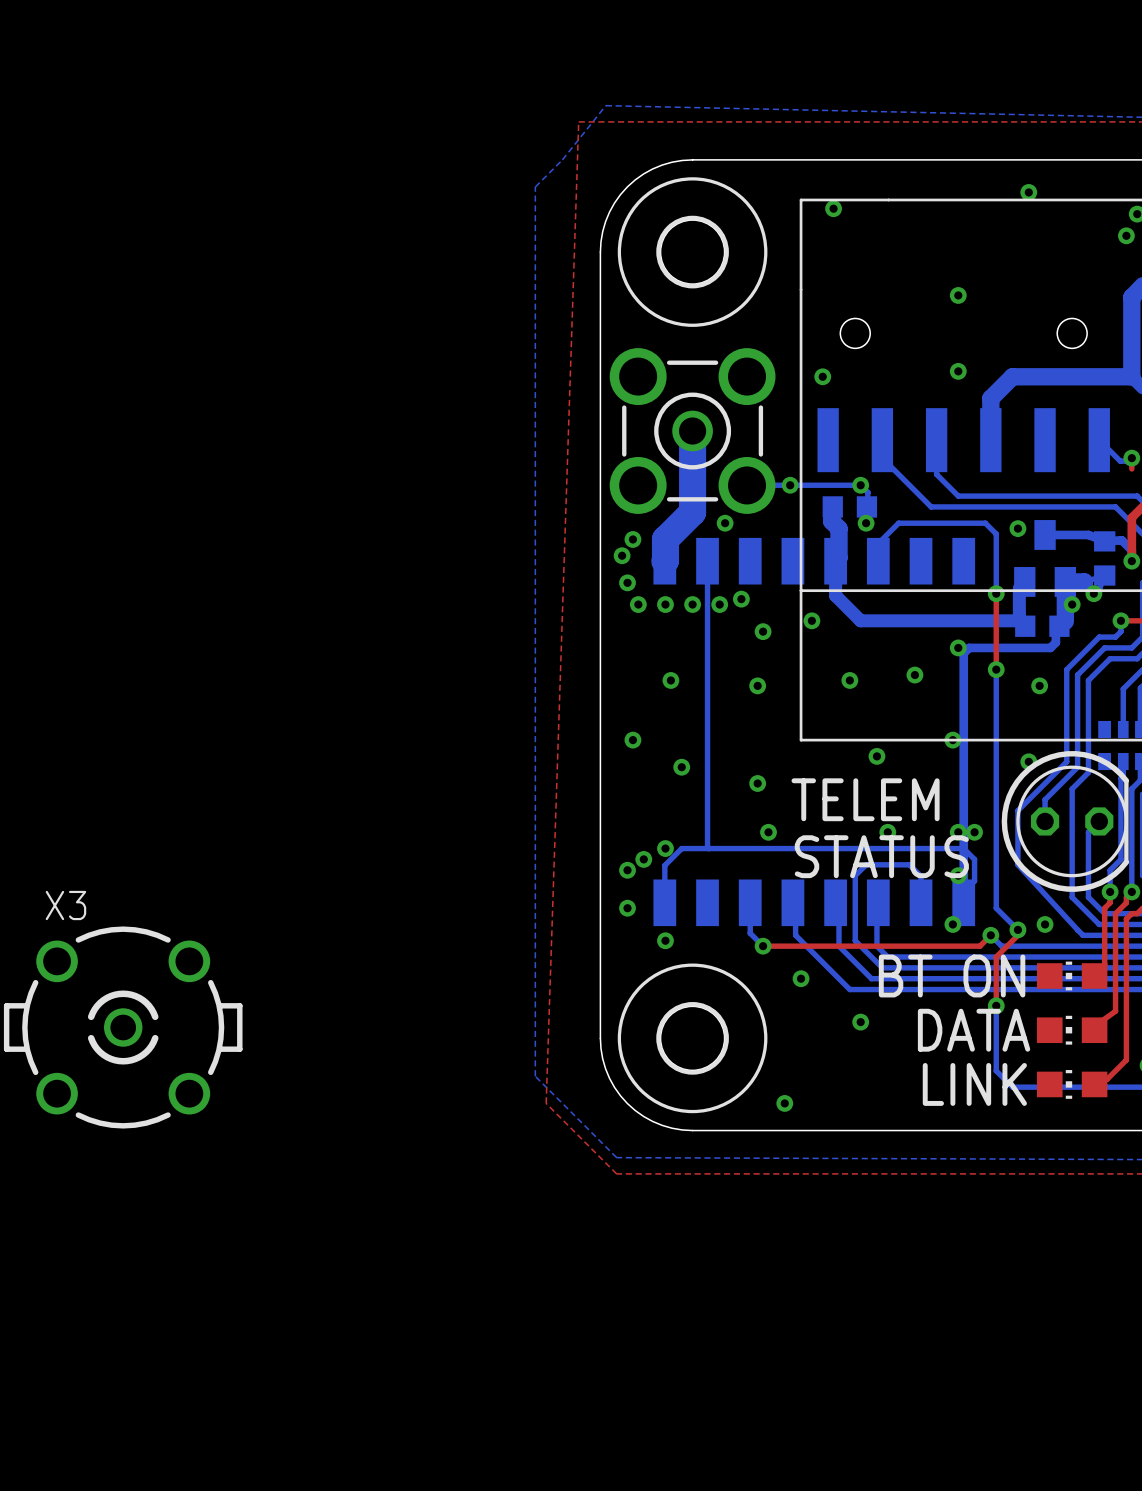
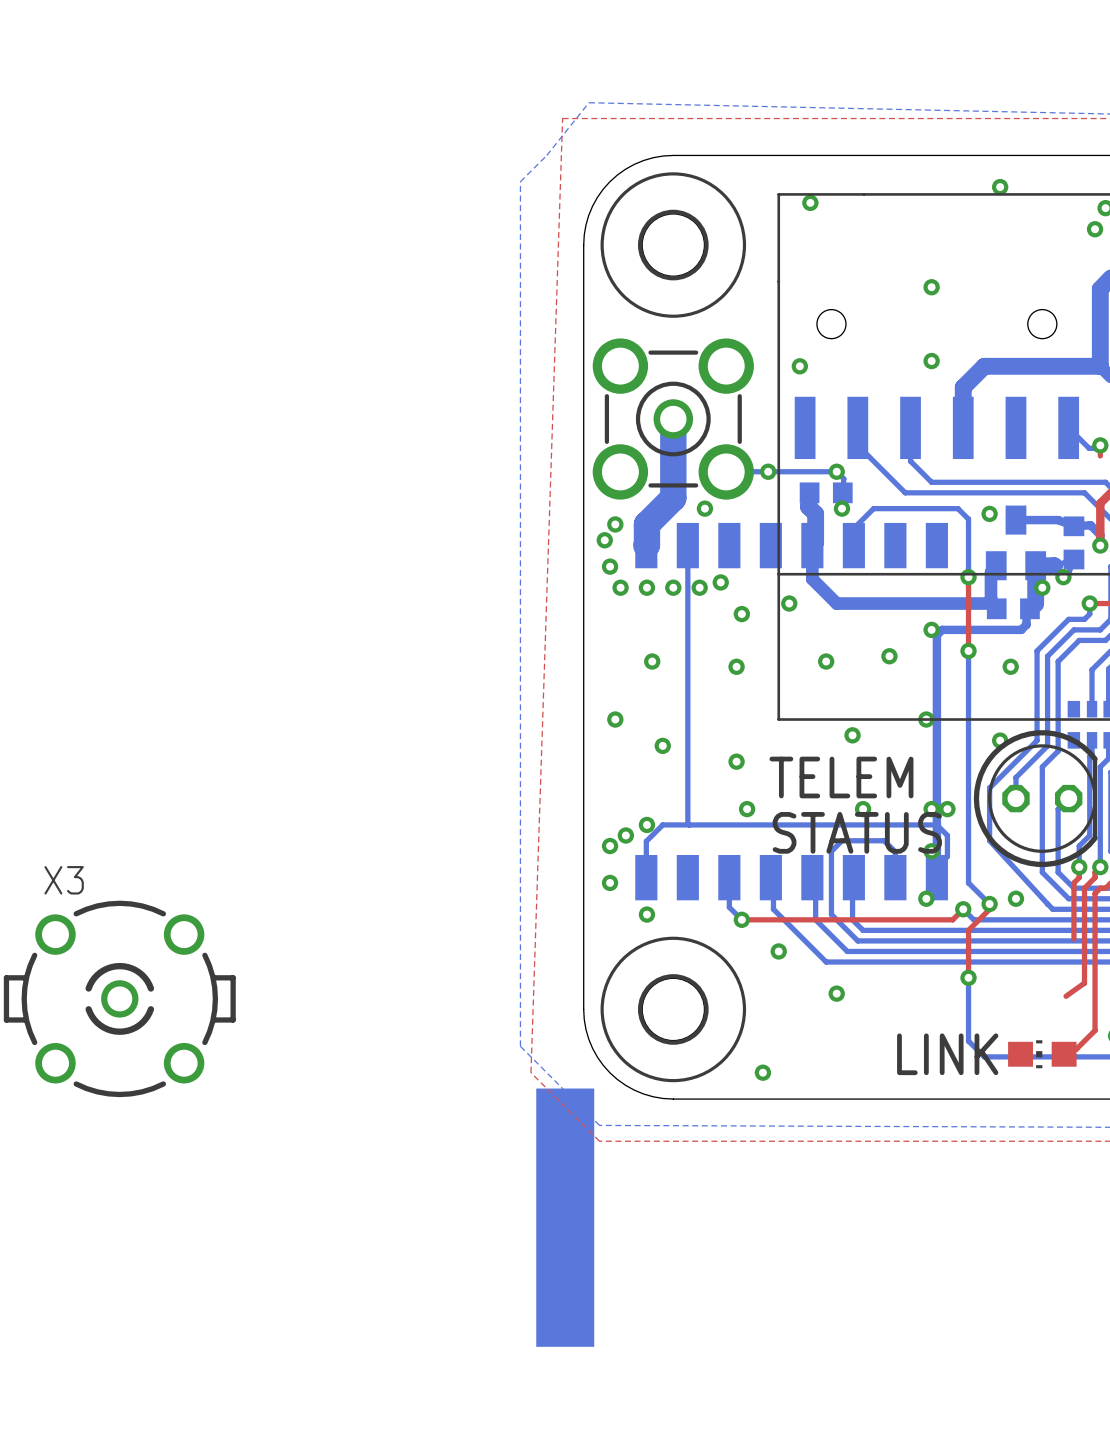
text: BT ON (952, 975) -> none
part: (1072, 975) -> none
text: DATA (974, 1030) -> none
part: (1072, 1030) -> none
drawing: none -> [536, 1088, 595, 1347]

